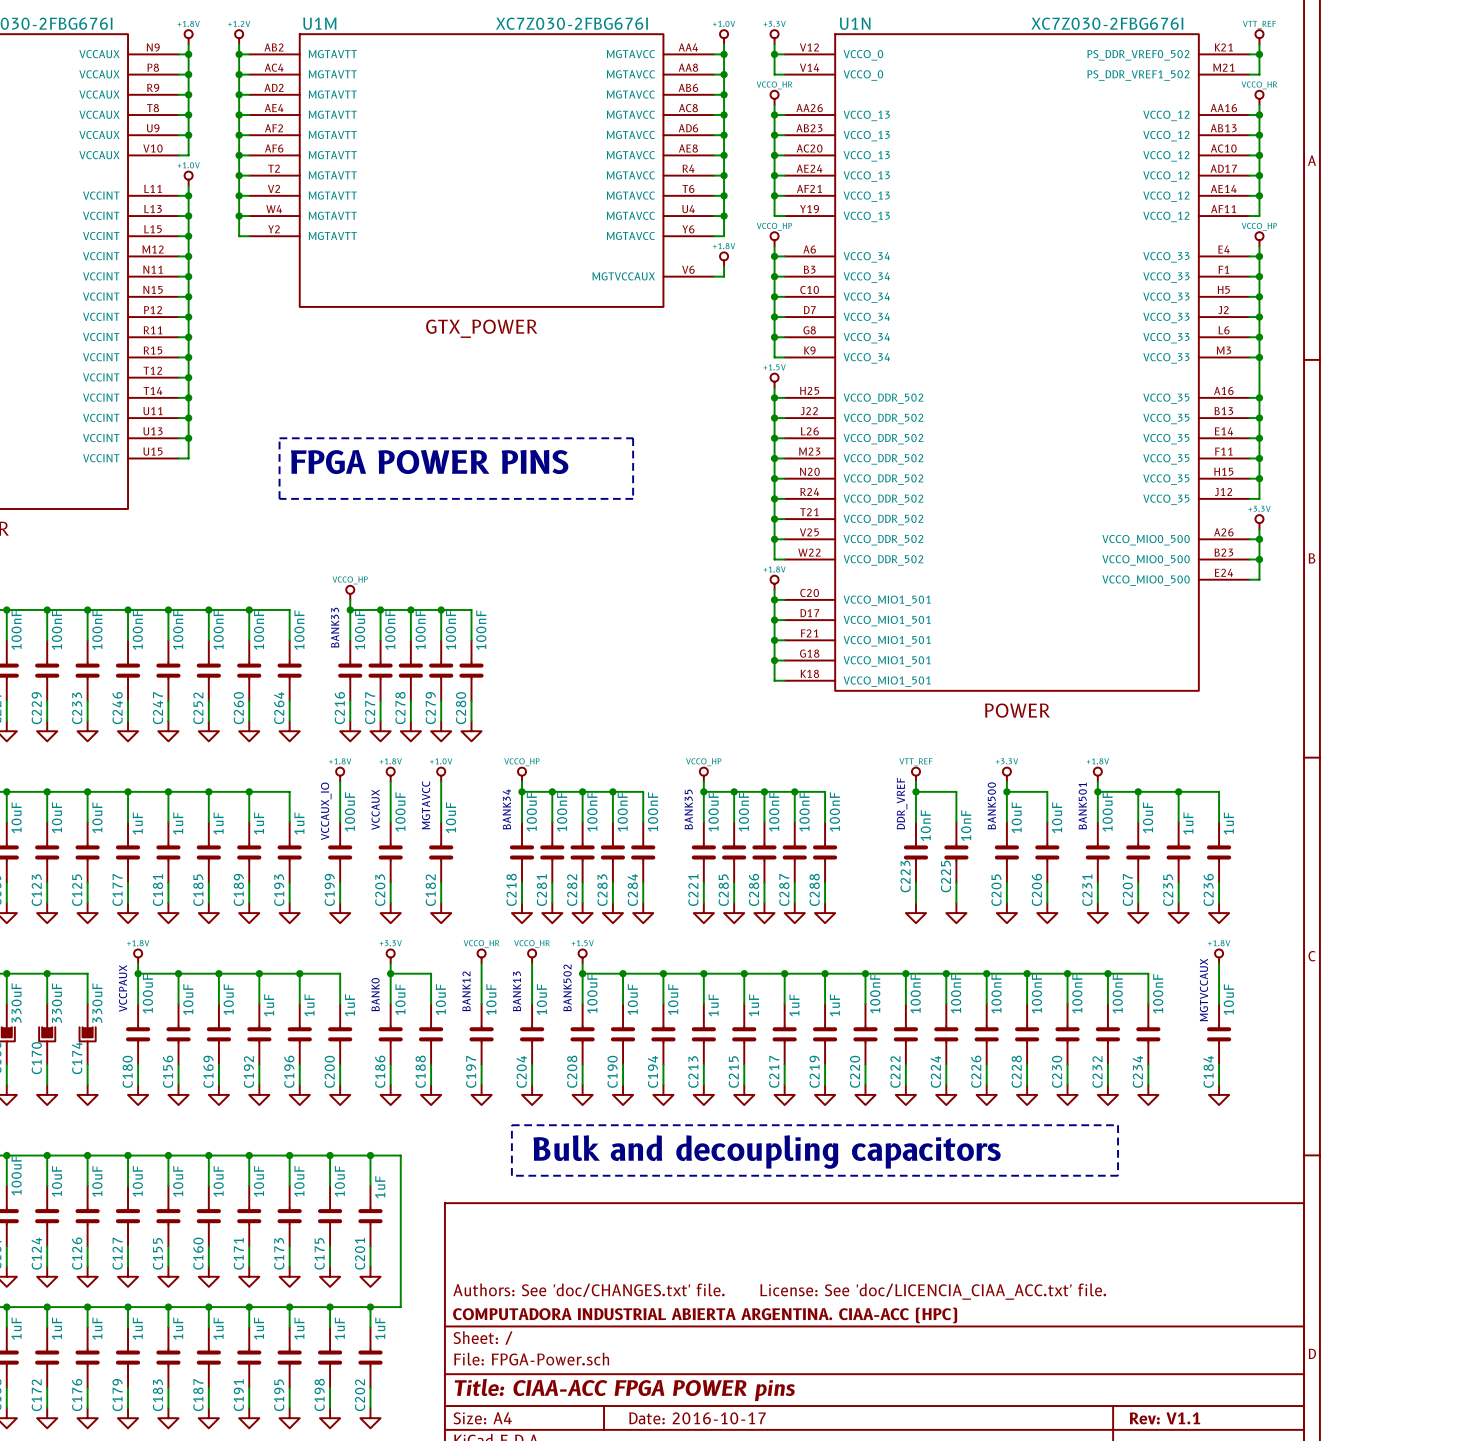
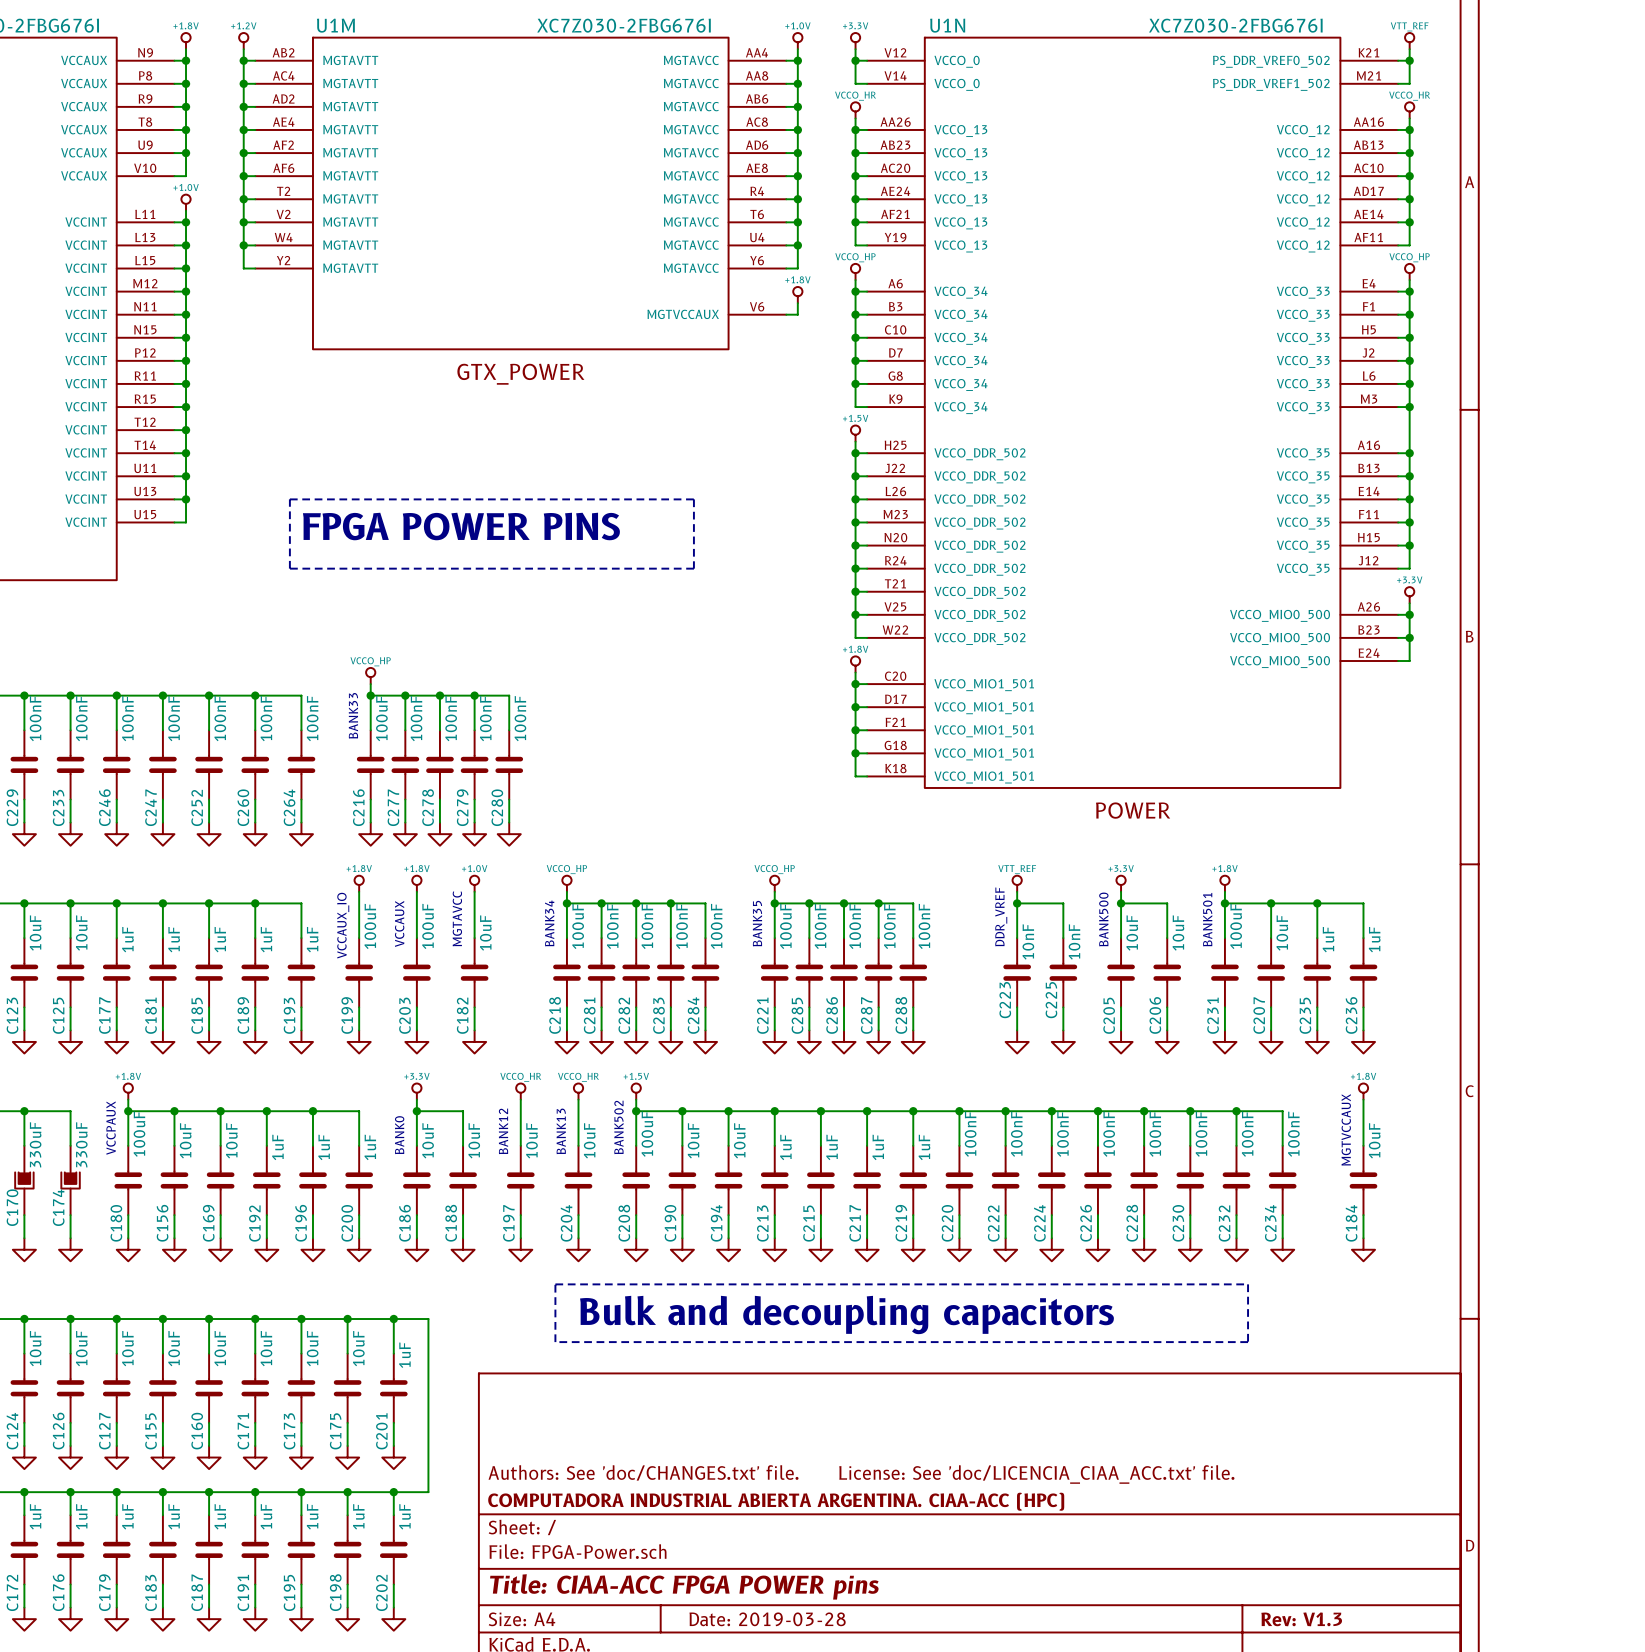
title block: Date: 2016-10-17 (697, 1418) -> Date: 2019-03-28 (767, 1619)
title block: Rev: V1.1 (1164, 1418) -> Rev: V1.3 (1301, 1619)

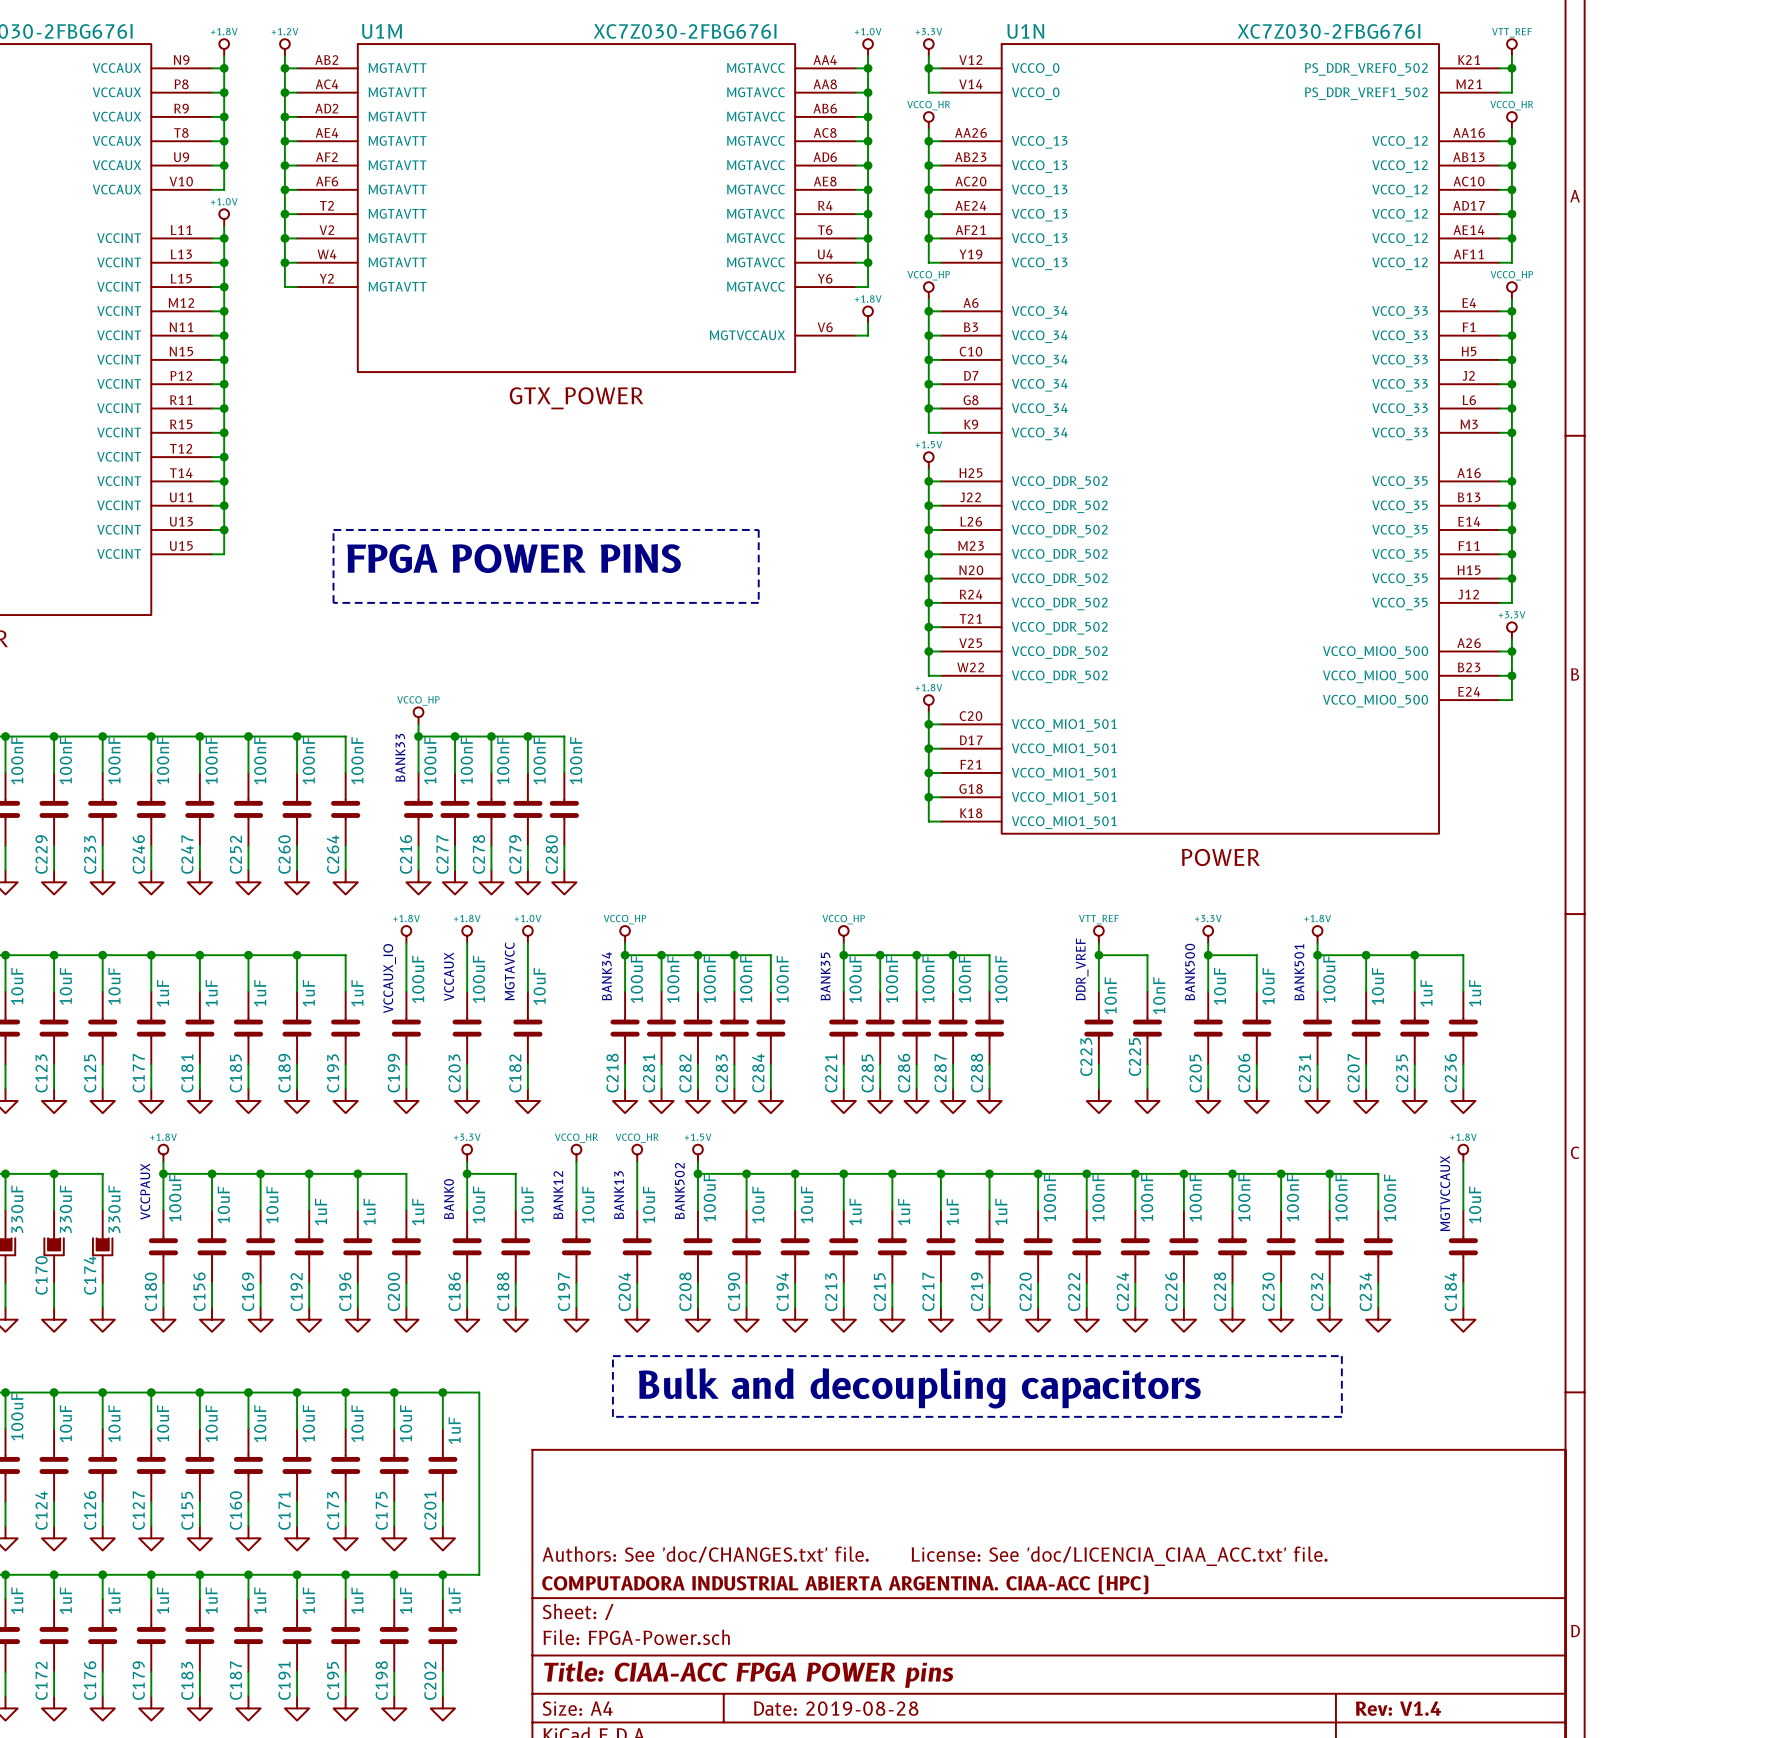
title block: Date: 2019-03-28 (767, 1619) -> Date: 2019-08-28 (836, 1708)
title block: Rev: V1.3 (1301, 1619) -> Rev: V1.4 (1398, 1708)

